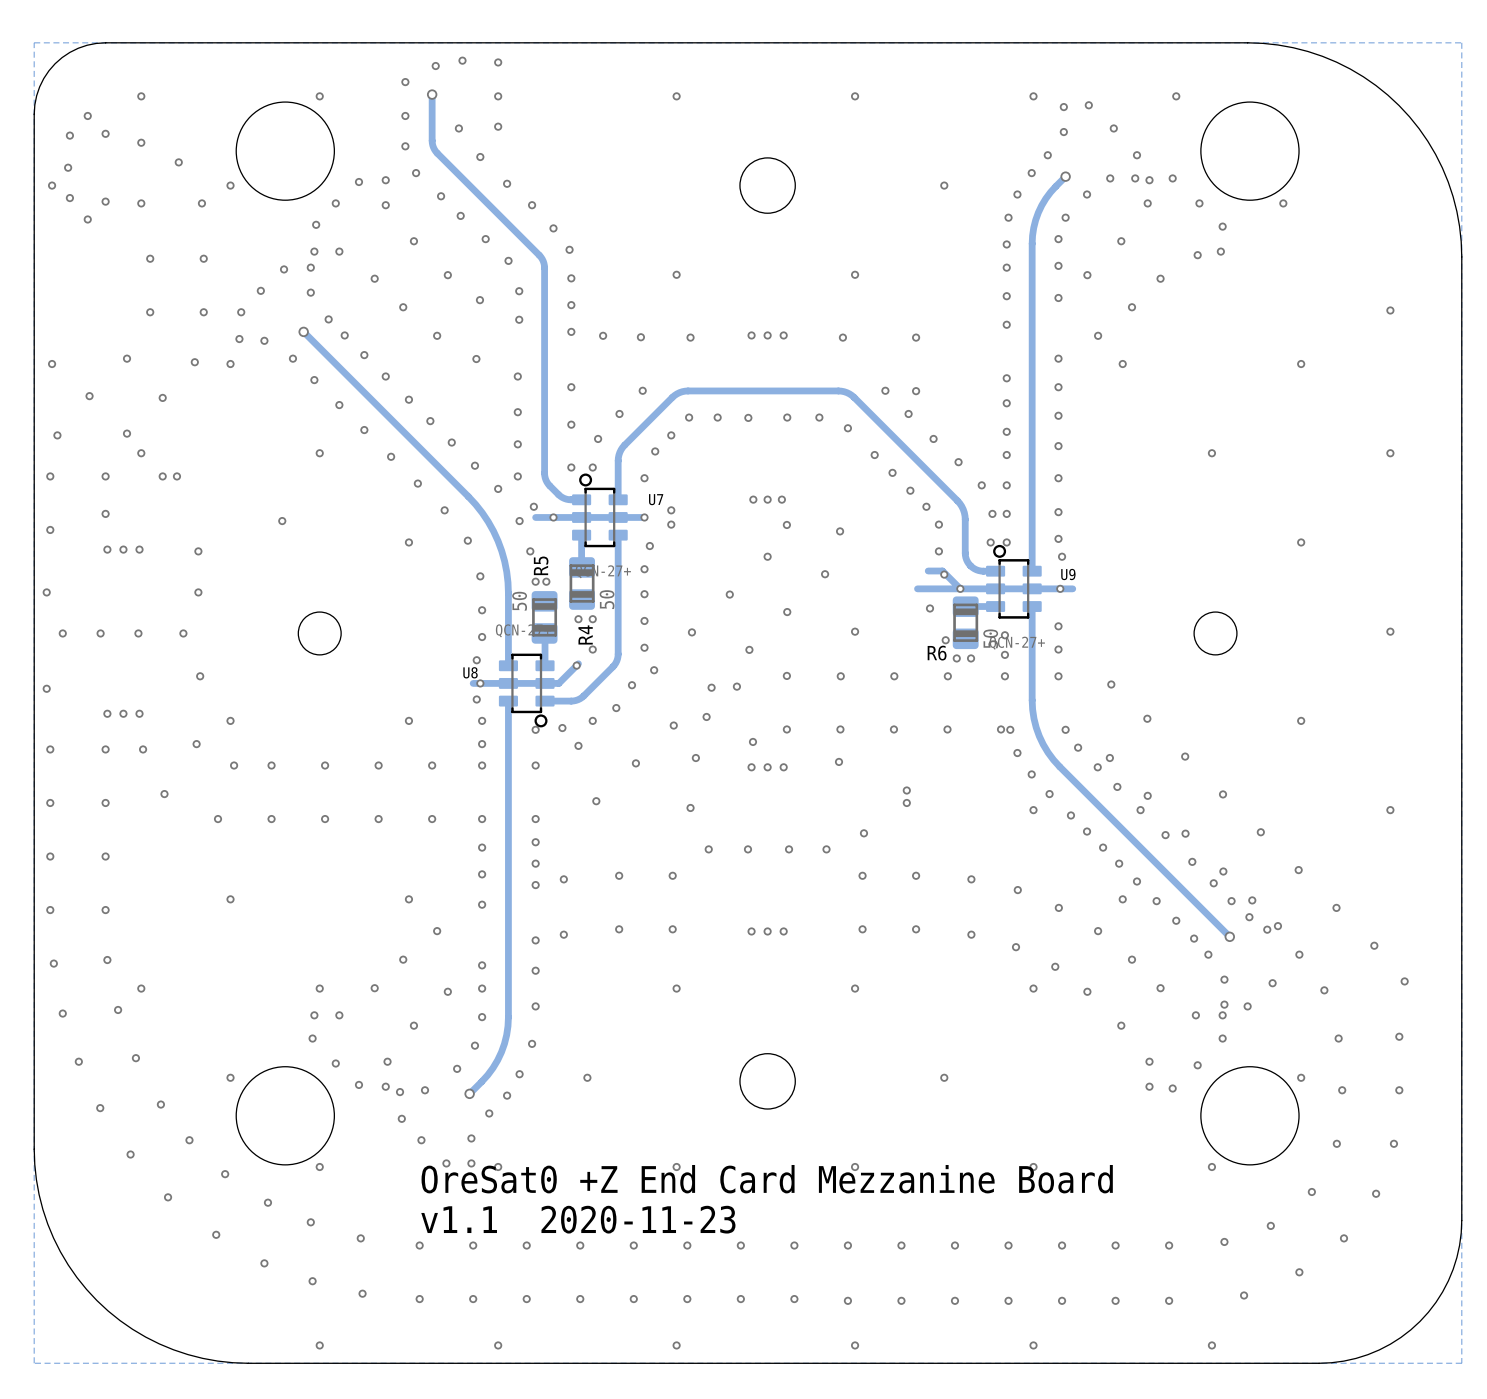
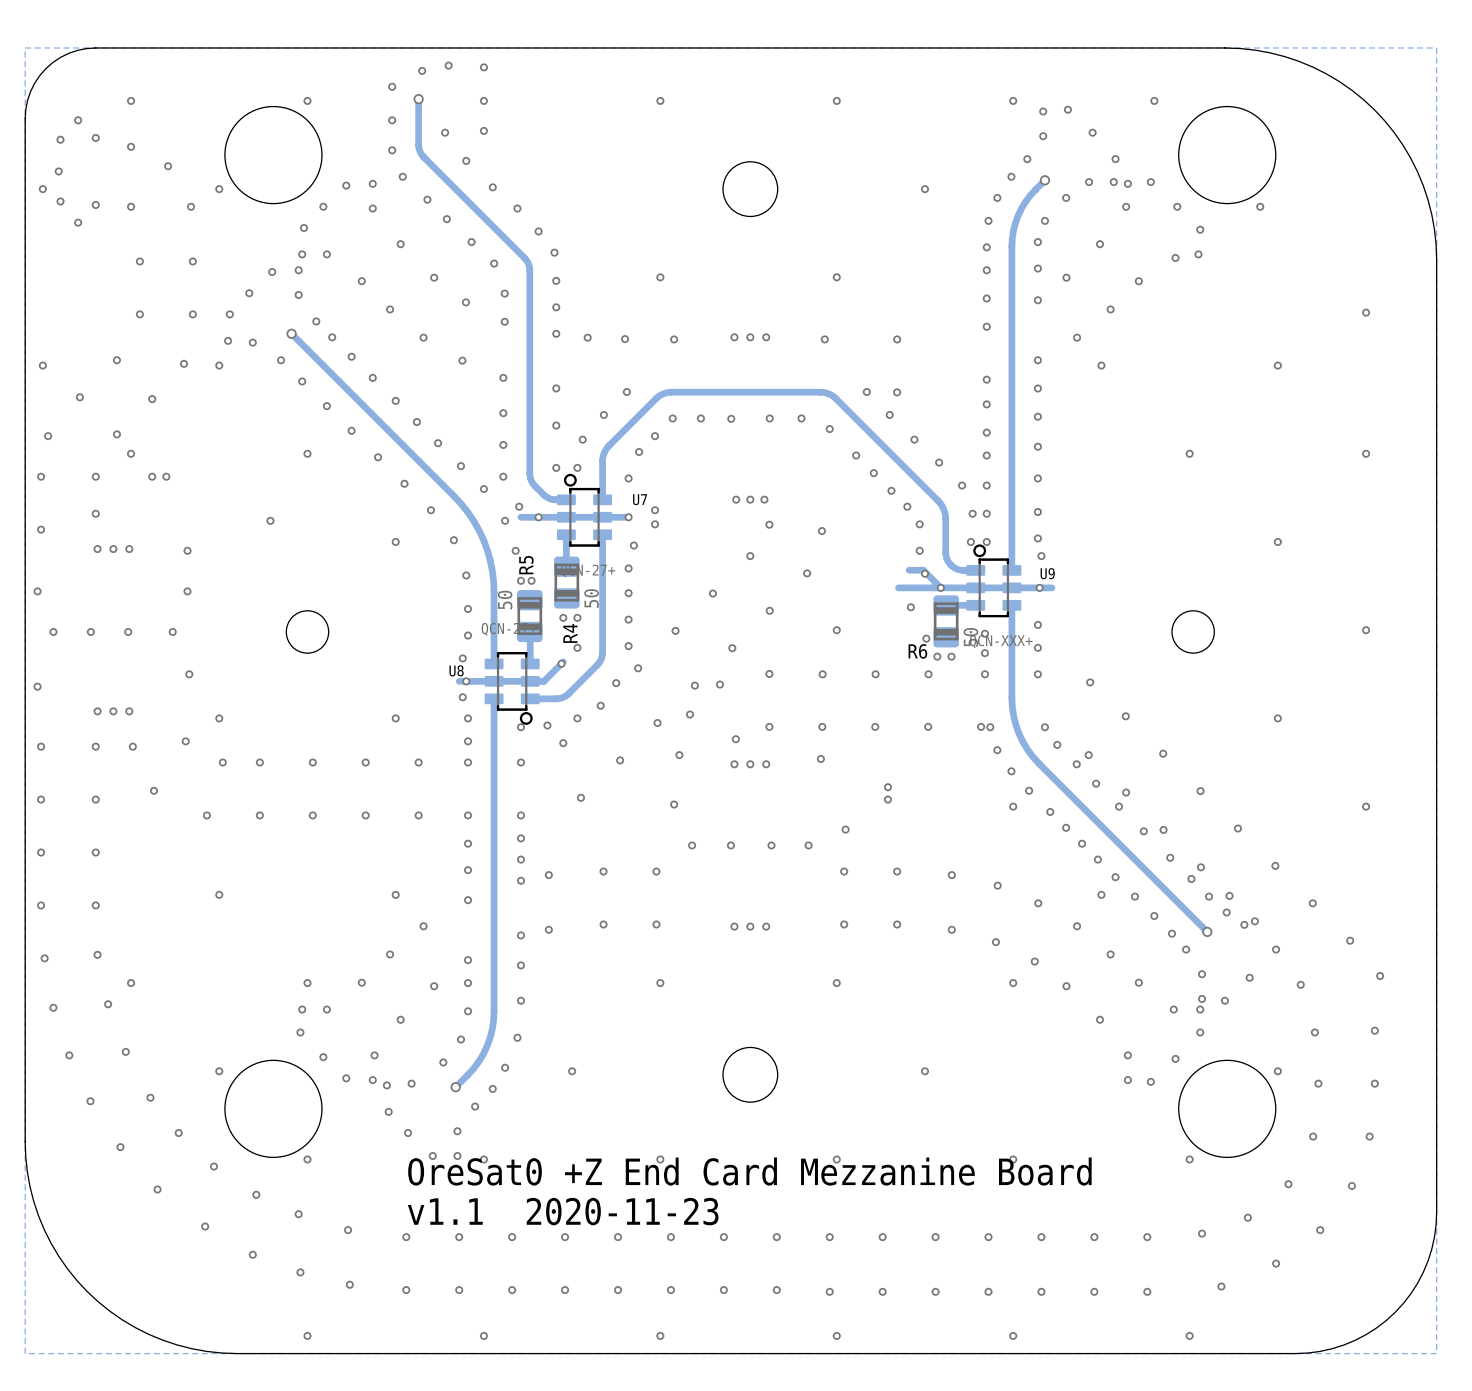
U9 value: QCN-27+ (1017, 643) -> QCN-XXX+ (1001, 641)

